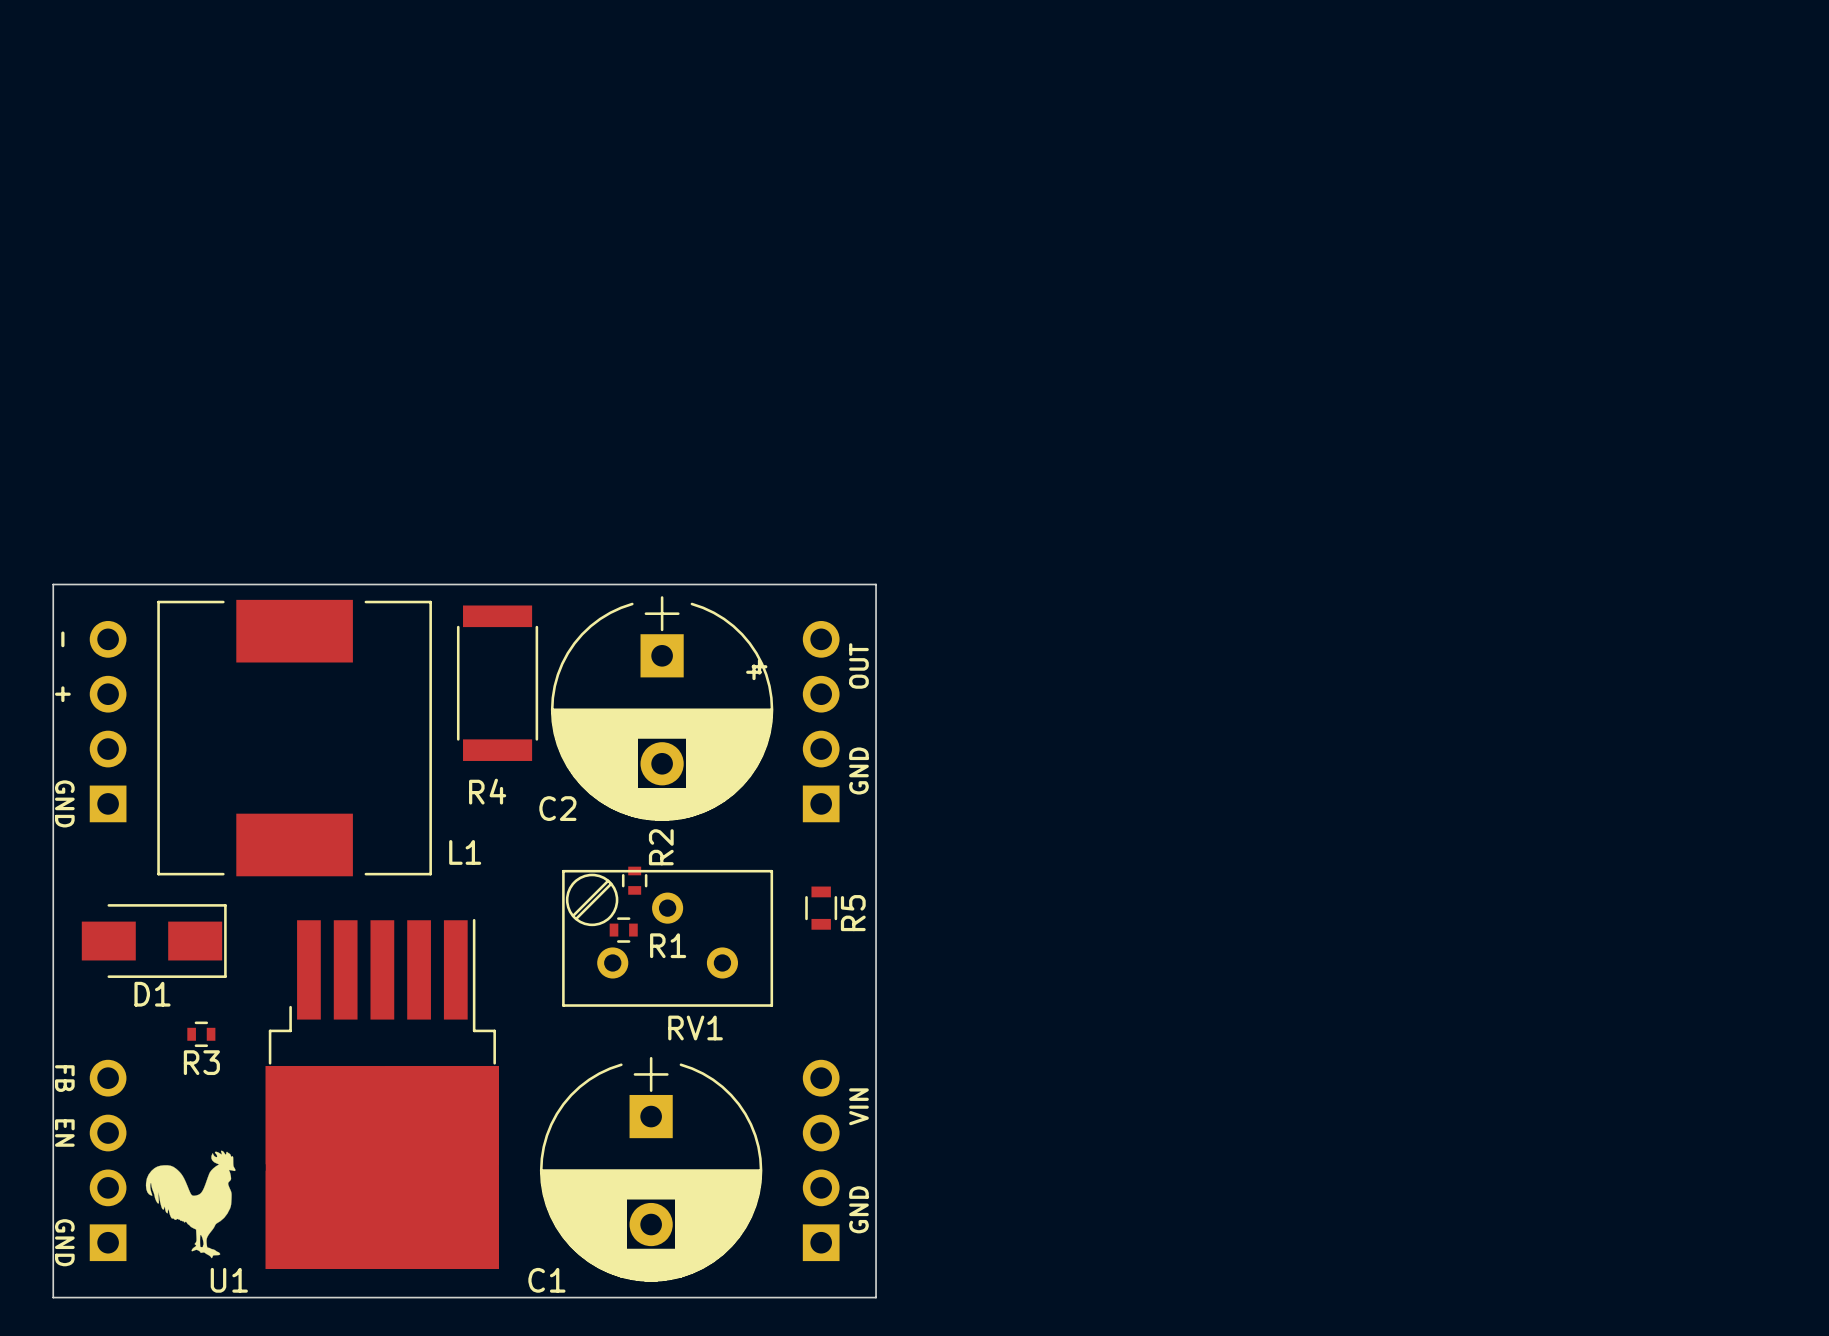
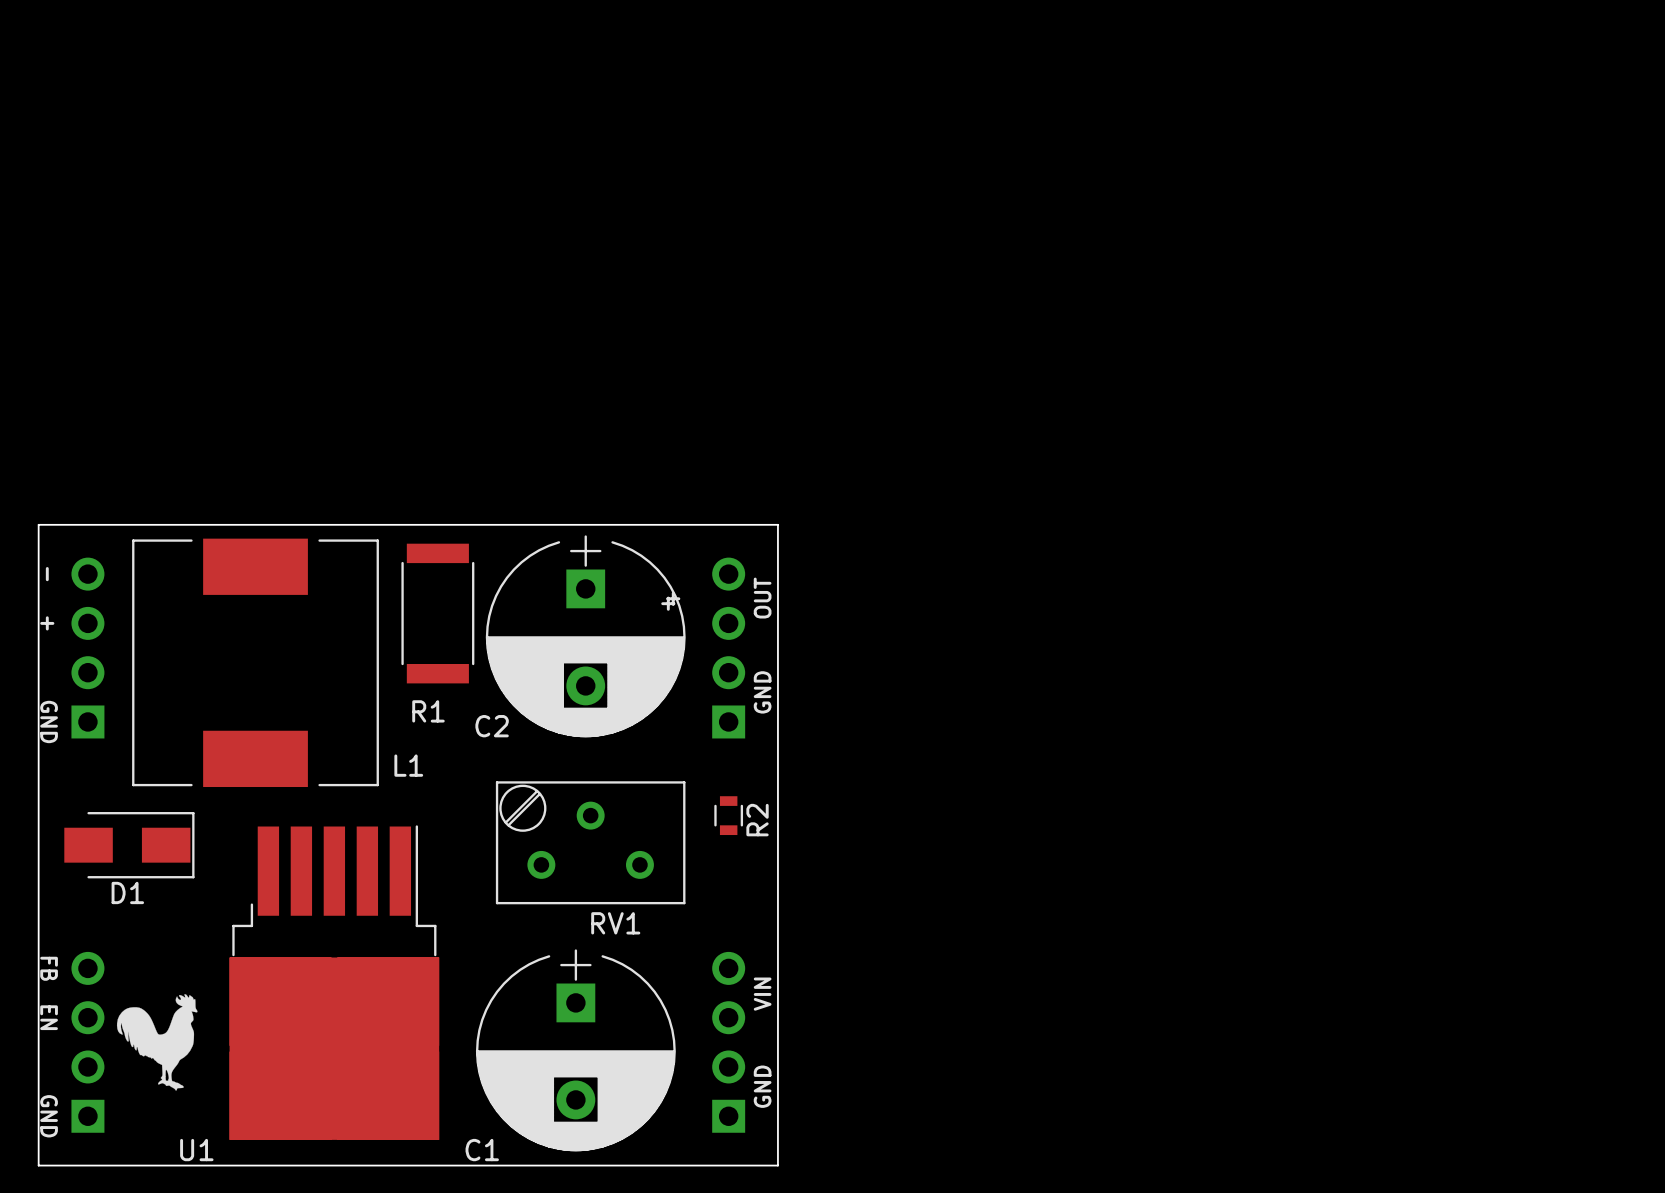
R4 name: R4 (487, 791) -> R1 (428, 711)
R2: (634, 880) -> none
R5 name: R5 (853, 913) -> R2 (757, 820)
R1: (623, 930) -> none
R3: (201, 1034) -> none
drawing position: (190, 1204) -> (157, 1042)

